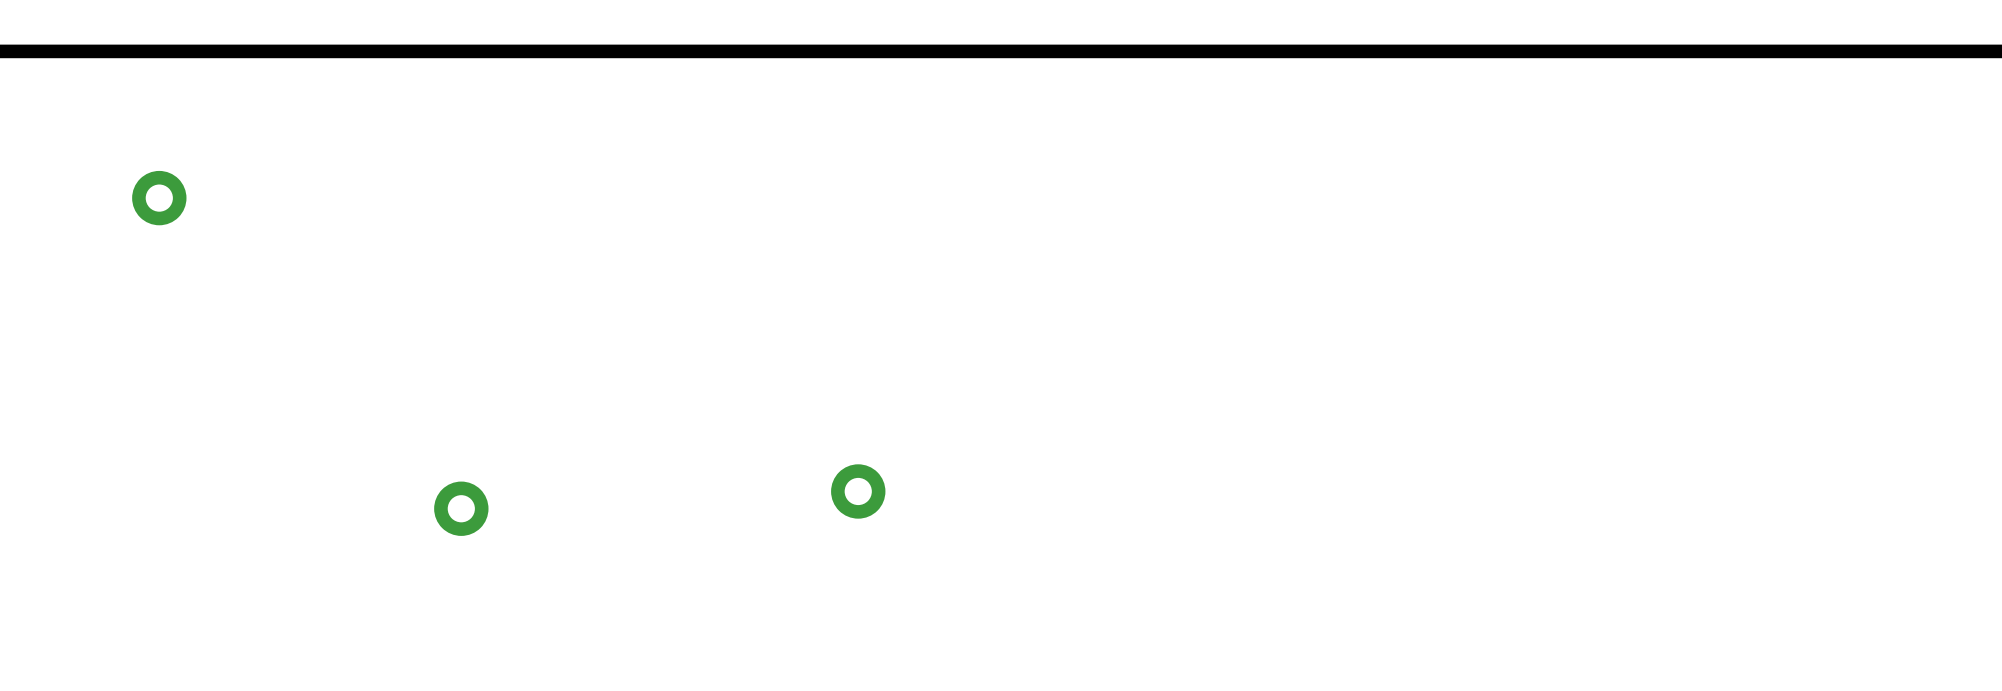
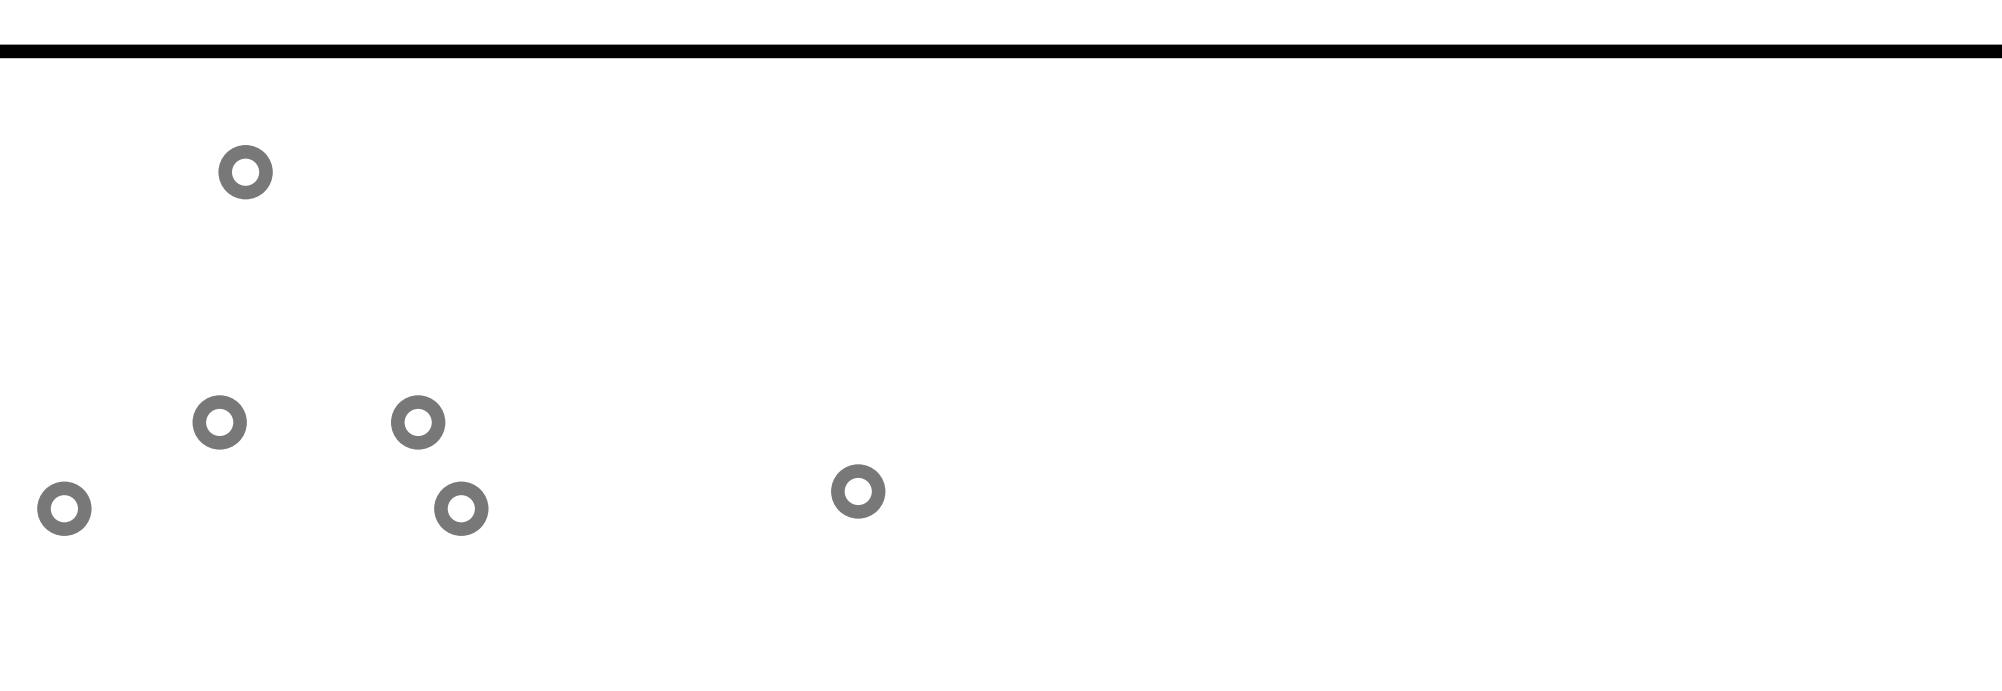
via position: (159, 198) -> (245, 172)
via: none -> (219, 422)
via: none -> (418, 422)
via: none -> (64, 508)

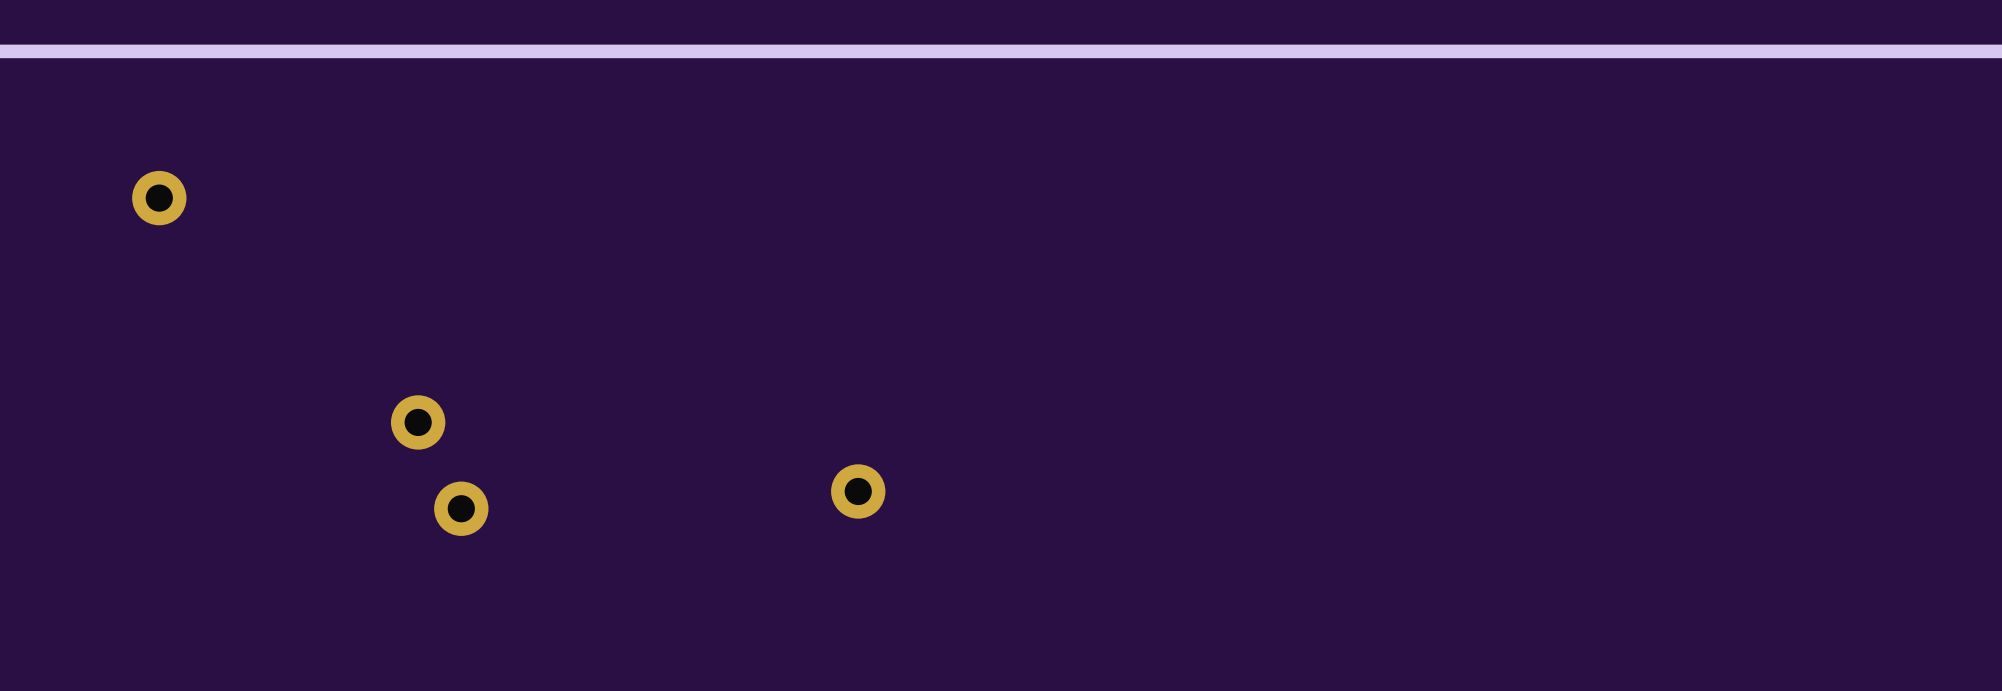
via position: (245, 172) -> (159, 198)
via: (219, 422) -> none
via: (64, 508) -> none

